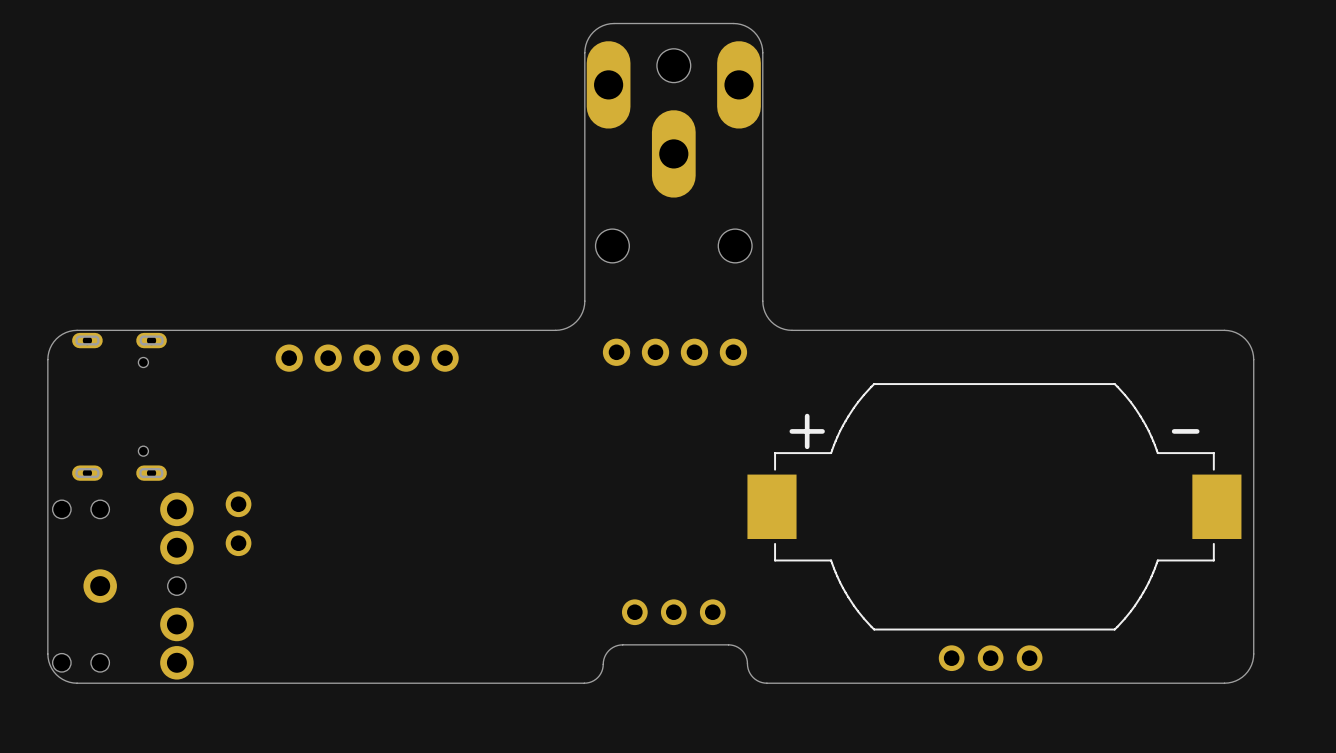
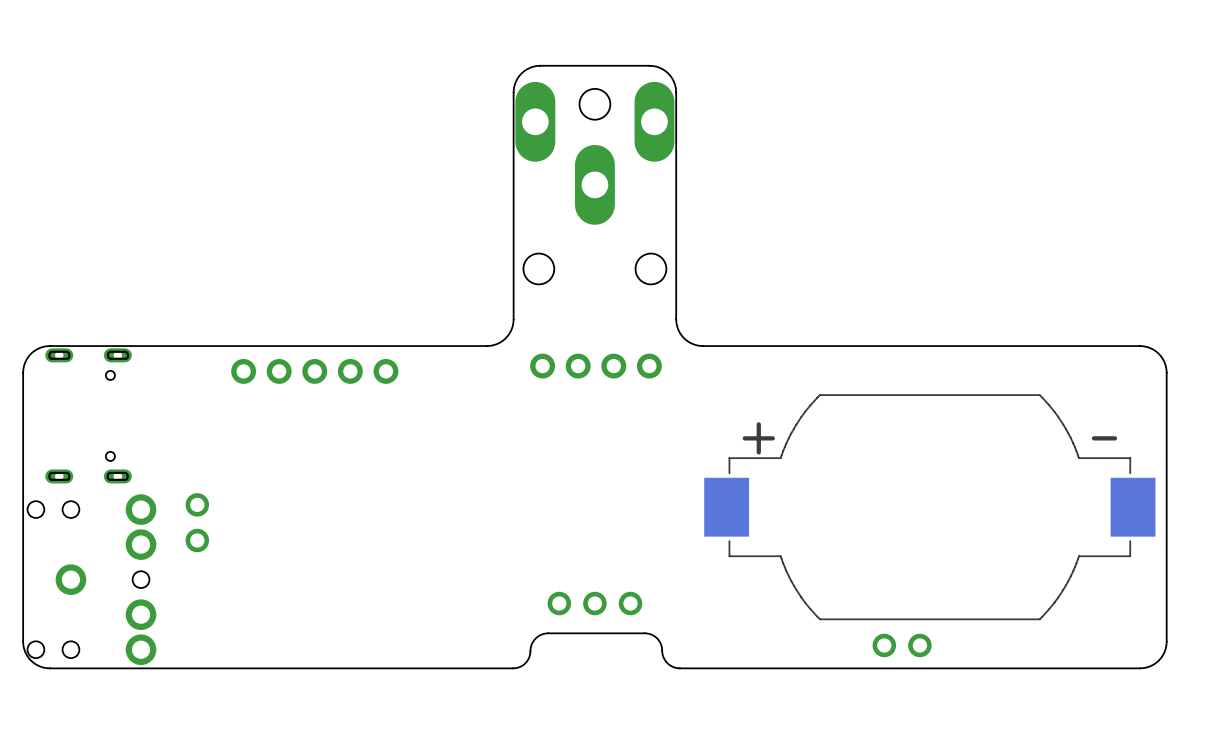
board edge: (1224, 330) (1235, 332) (1245, 338) (1251, 348) (1253, 359) (1253, 657) (1249, 668) (1242, 677) (1224, 683) -> (1097, 346) (1139, 346) (1150, 348) (1163, 359) (1166, 372) (1165, 648) (1158, 660) (1146, 667) (1097, 668)
part position: (994, 506) -> (929, 507)
part: (990, 658) -> none

